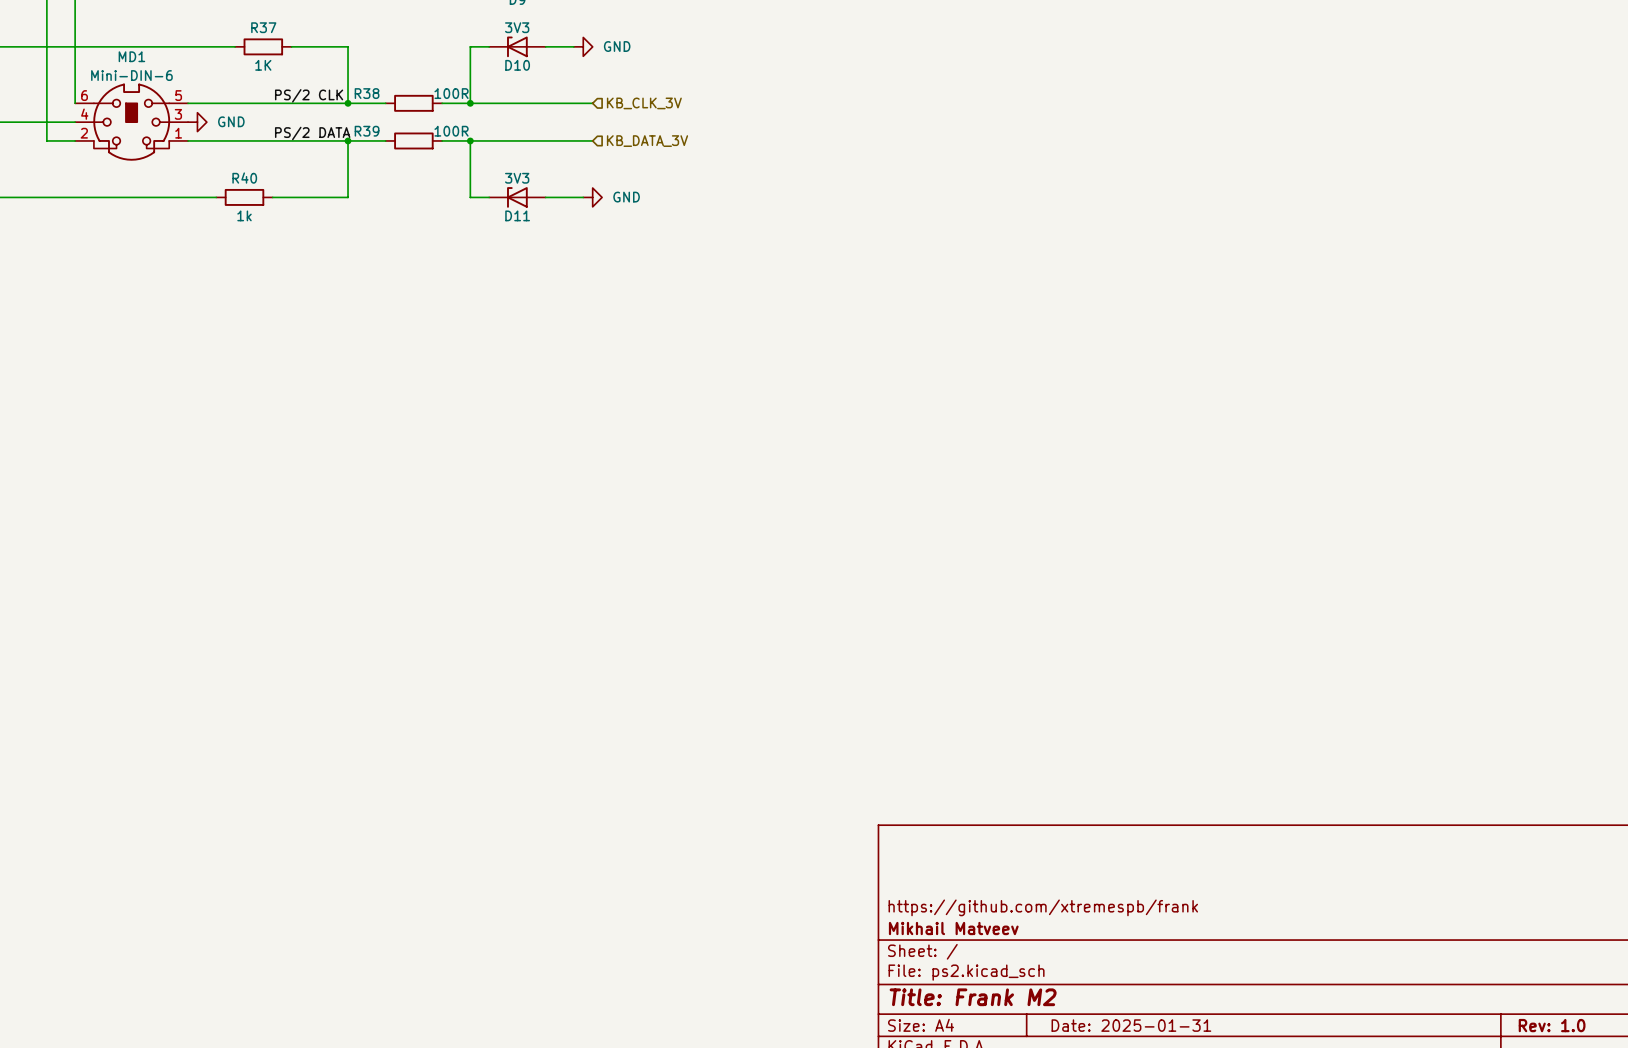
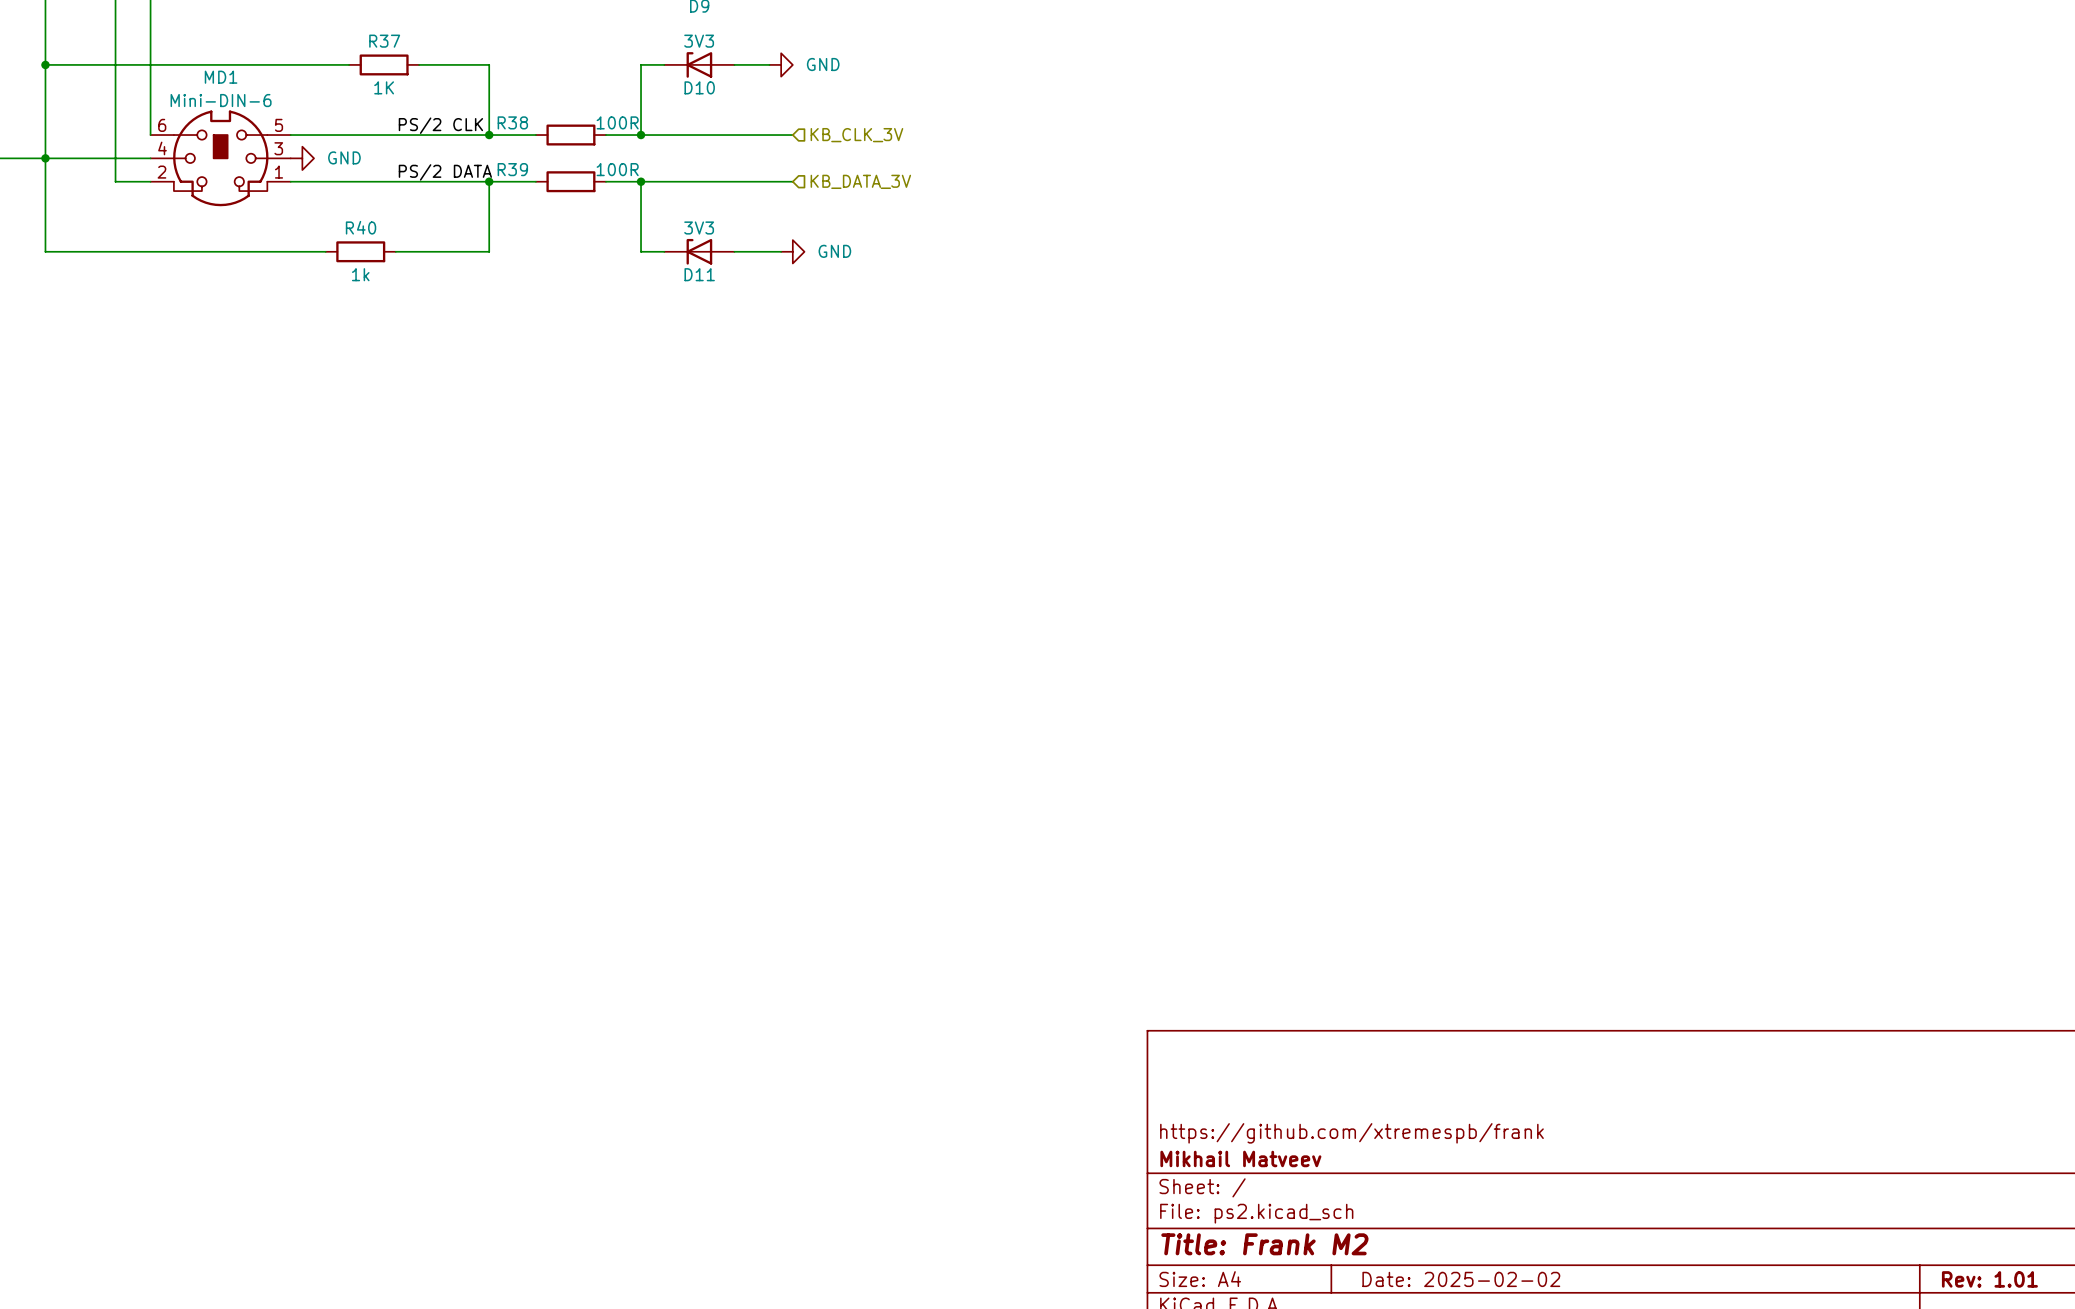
title block: Date: 2025-01-31 (1131, 1025) -> Date: 2025-02-02 (1461, 1279)
title block: Rev: 1.0 (1552, 1025) -> Rev: 1.01 (1989, 1279)

